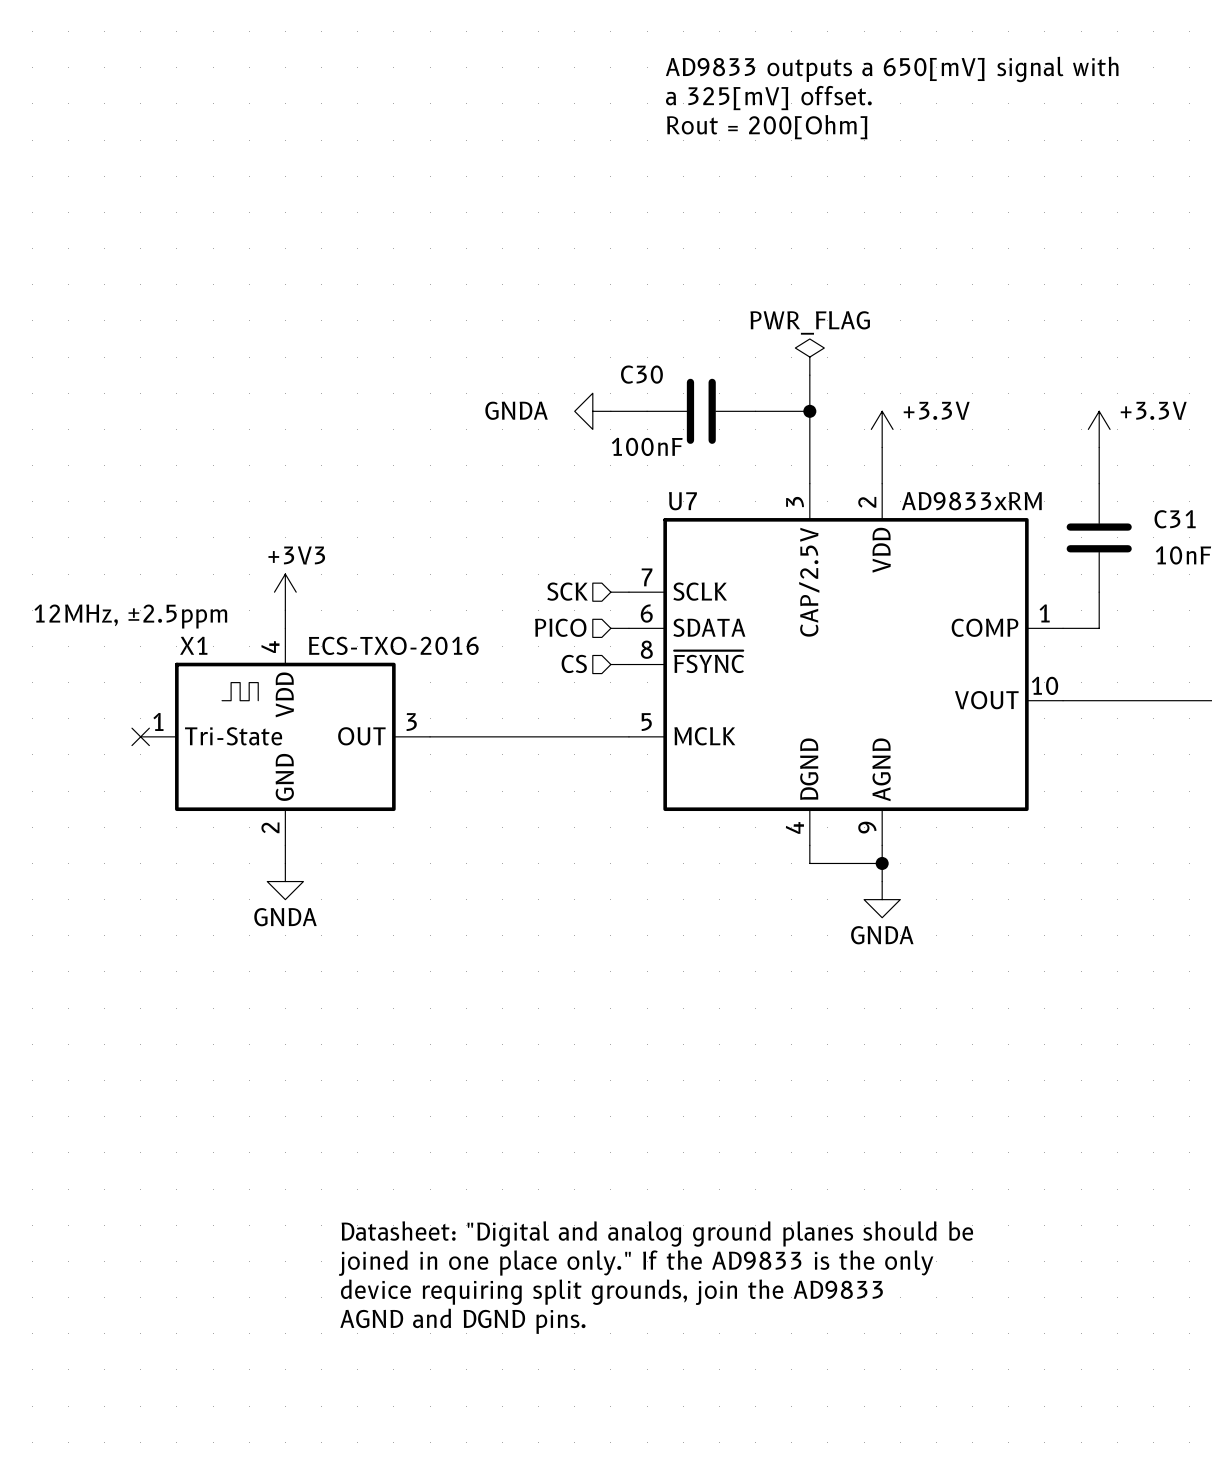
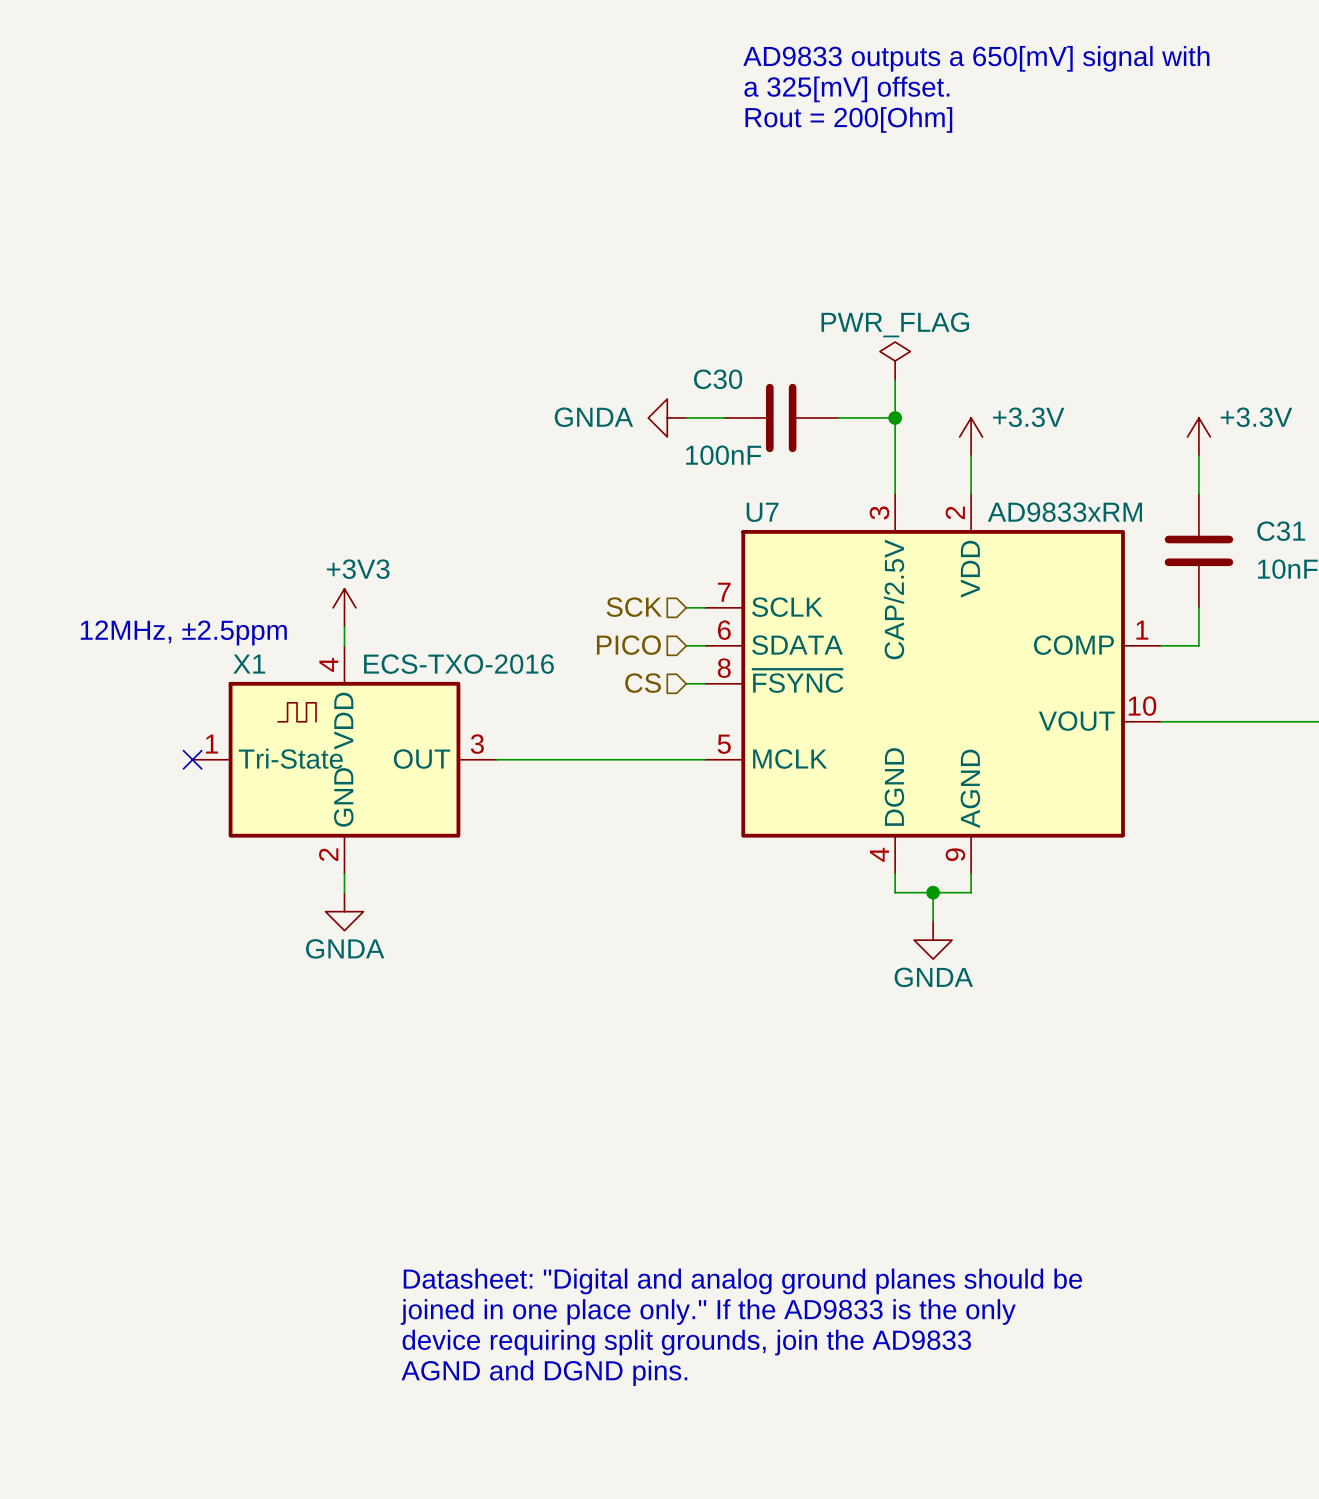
wire: none -> (933, 892) (933, 921)
wire: (882, 863) (882, 881) -> none
junction position: (882, 863) -> (933, 892)
power symbol position: GNDA (882, 899) -> GNDA (933, 940)

